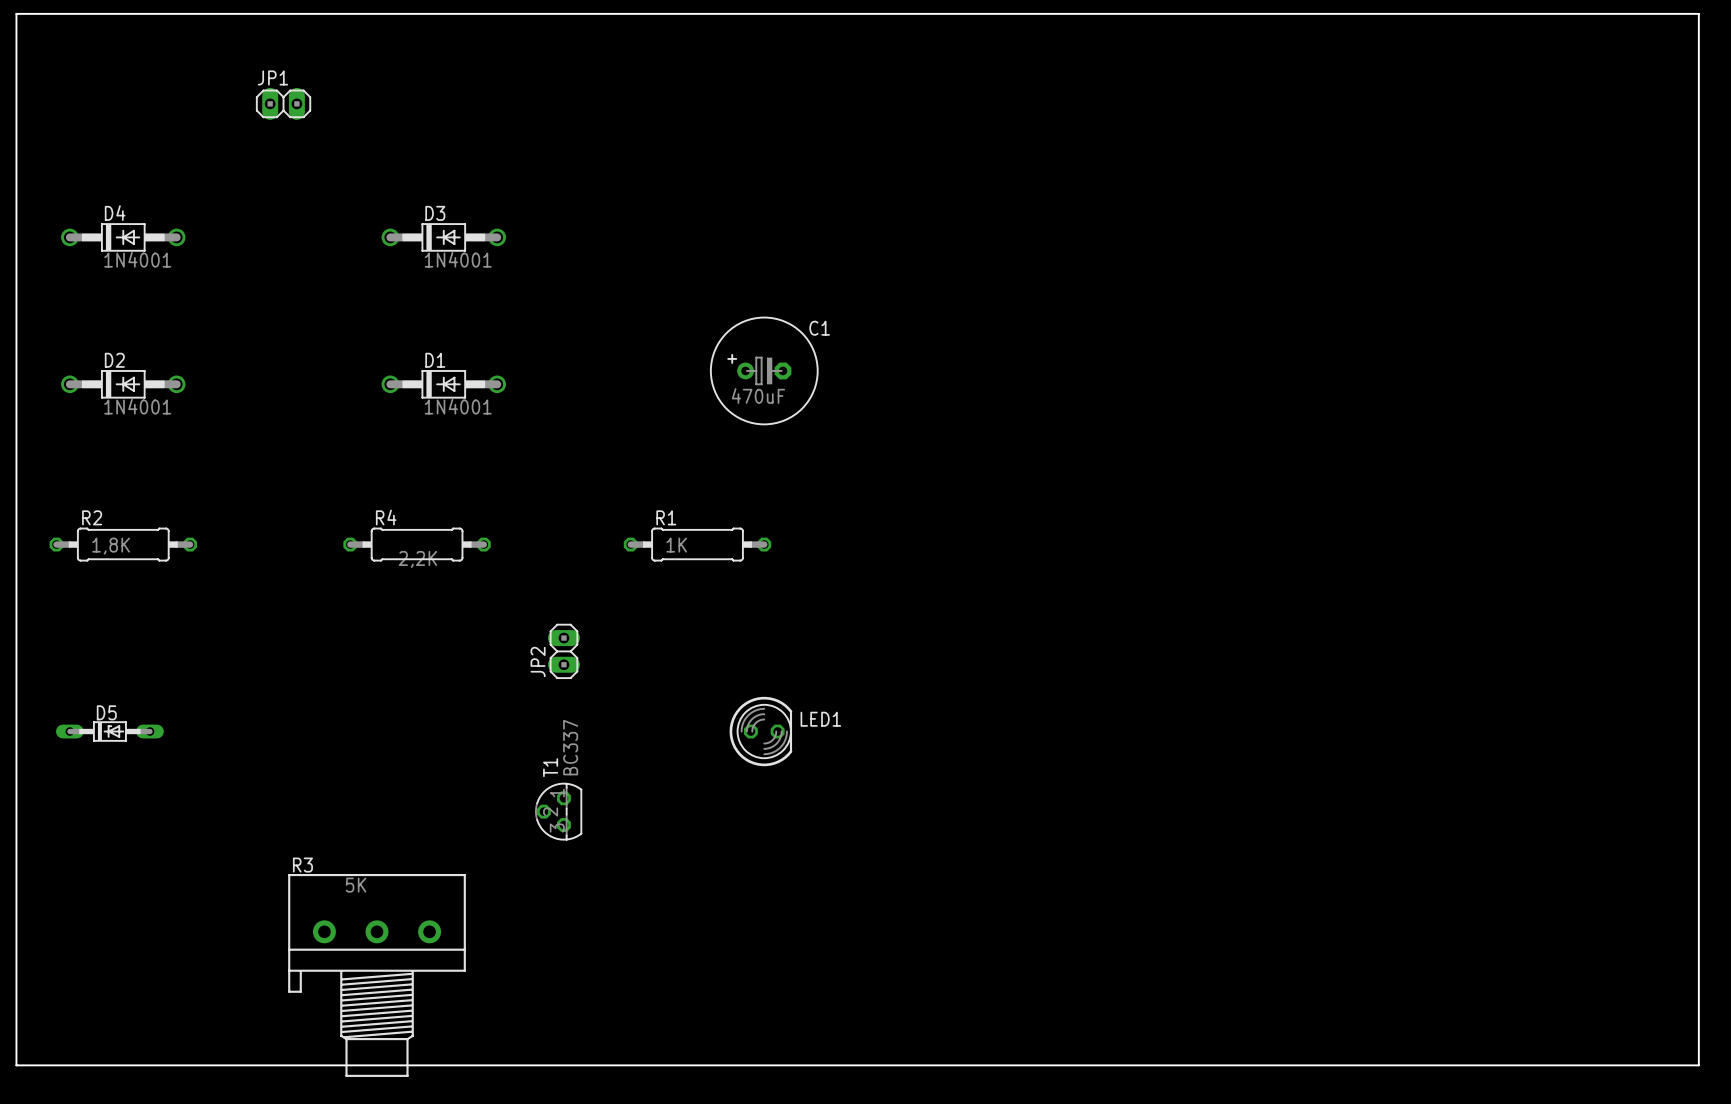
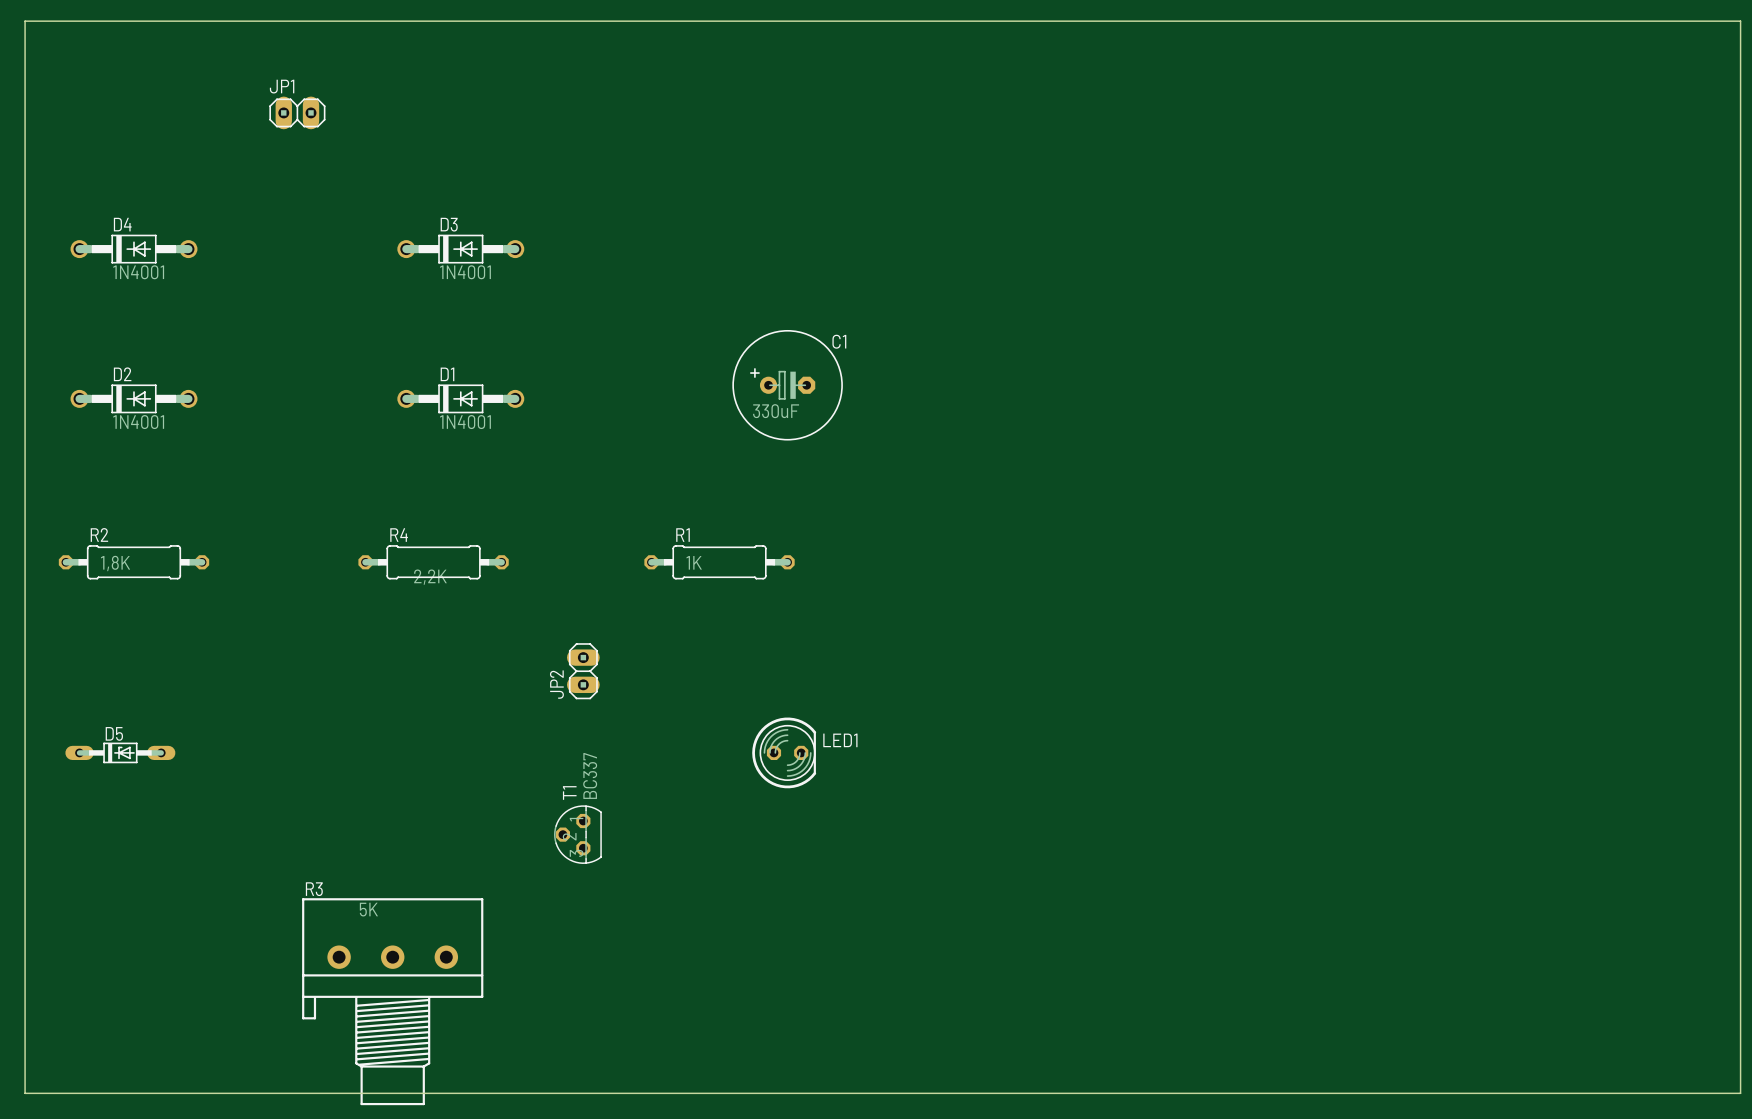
C1 value: 470uF (758, 396) -> 330uF (776, 411)

